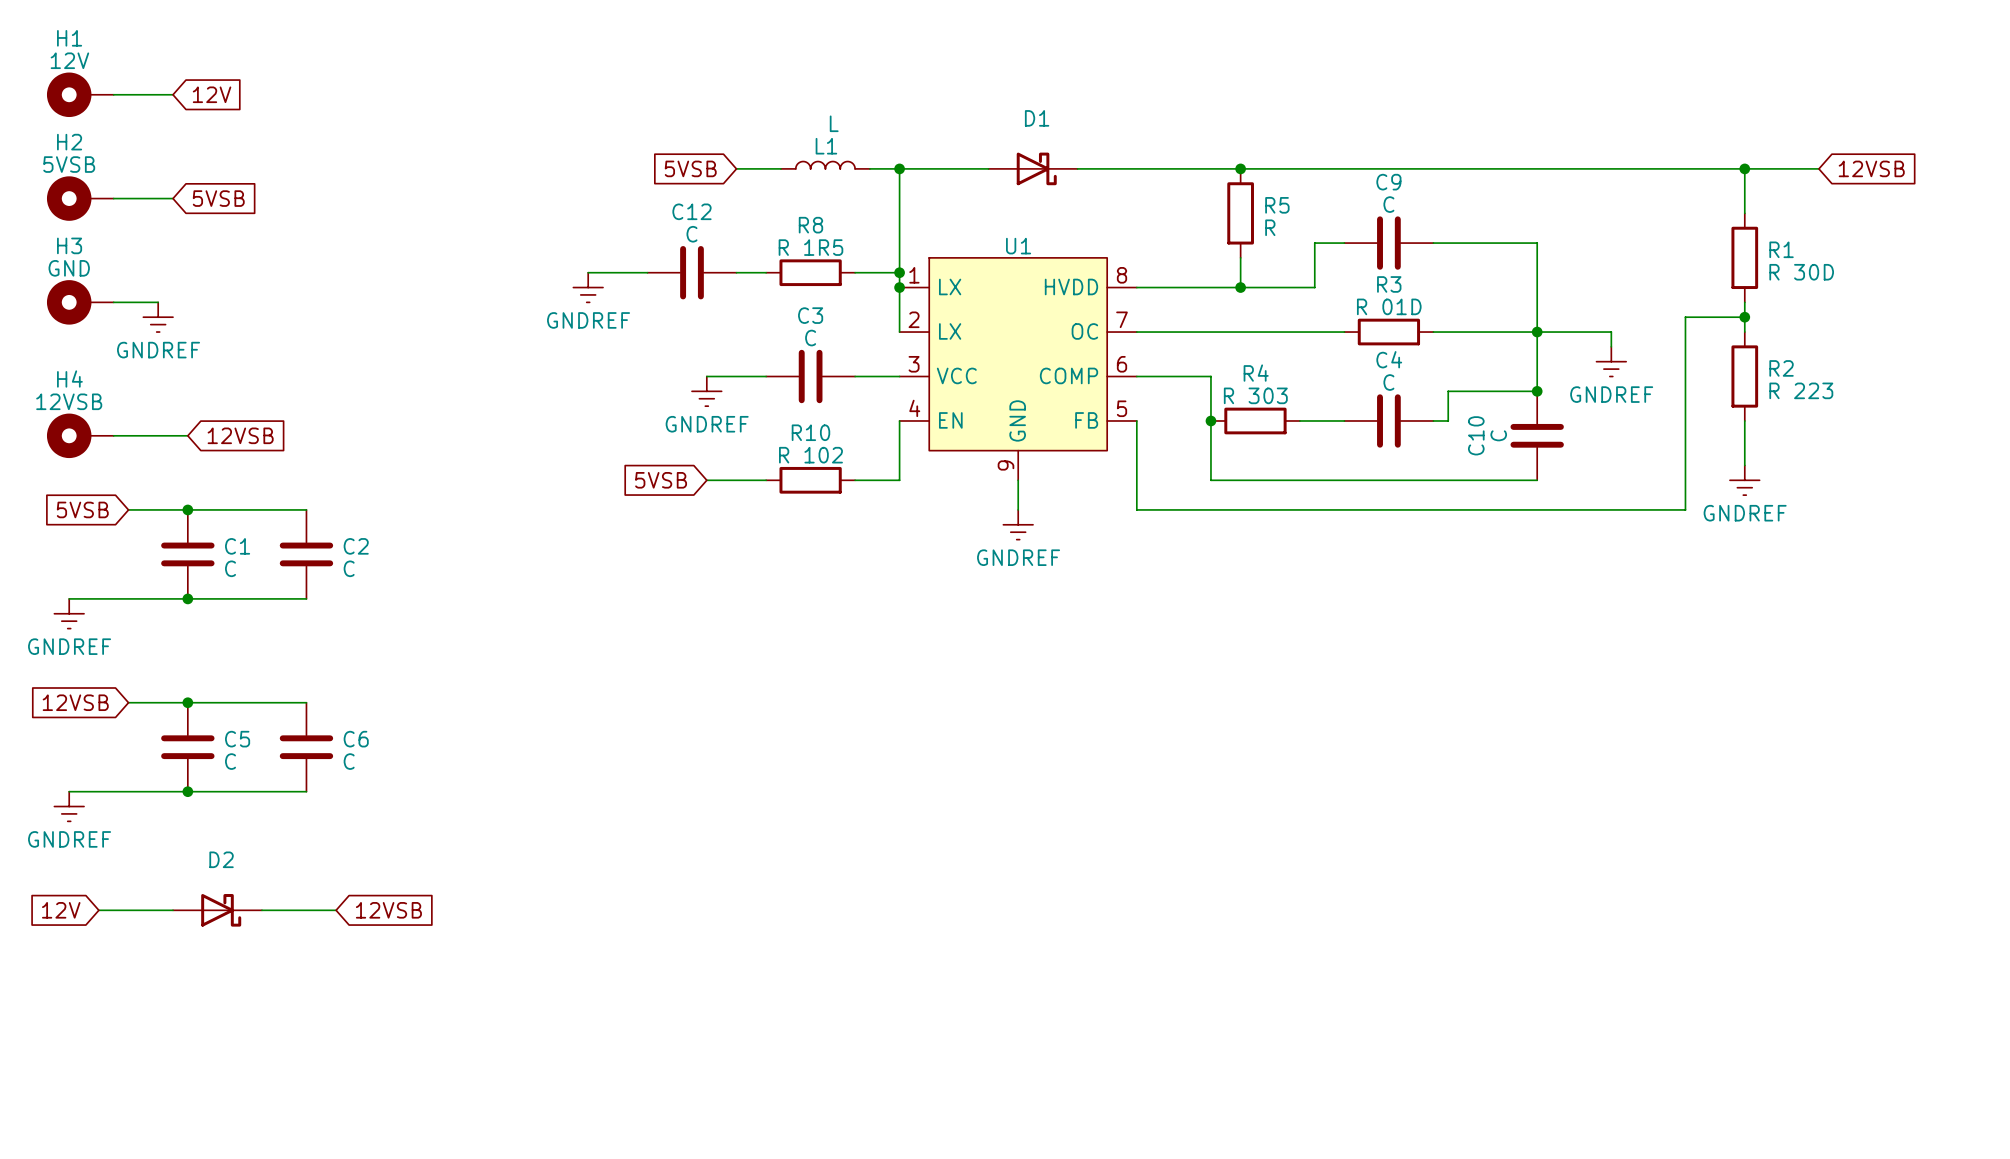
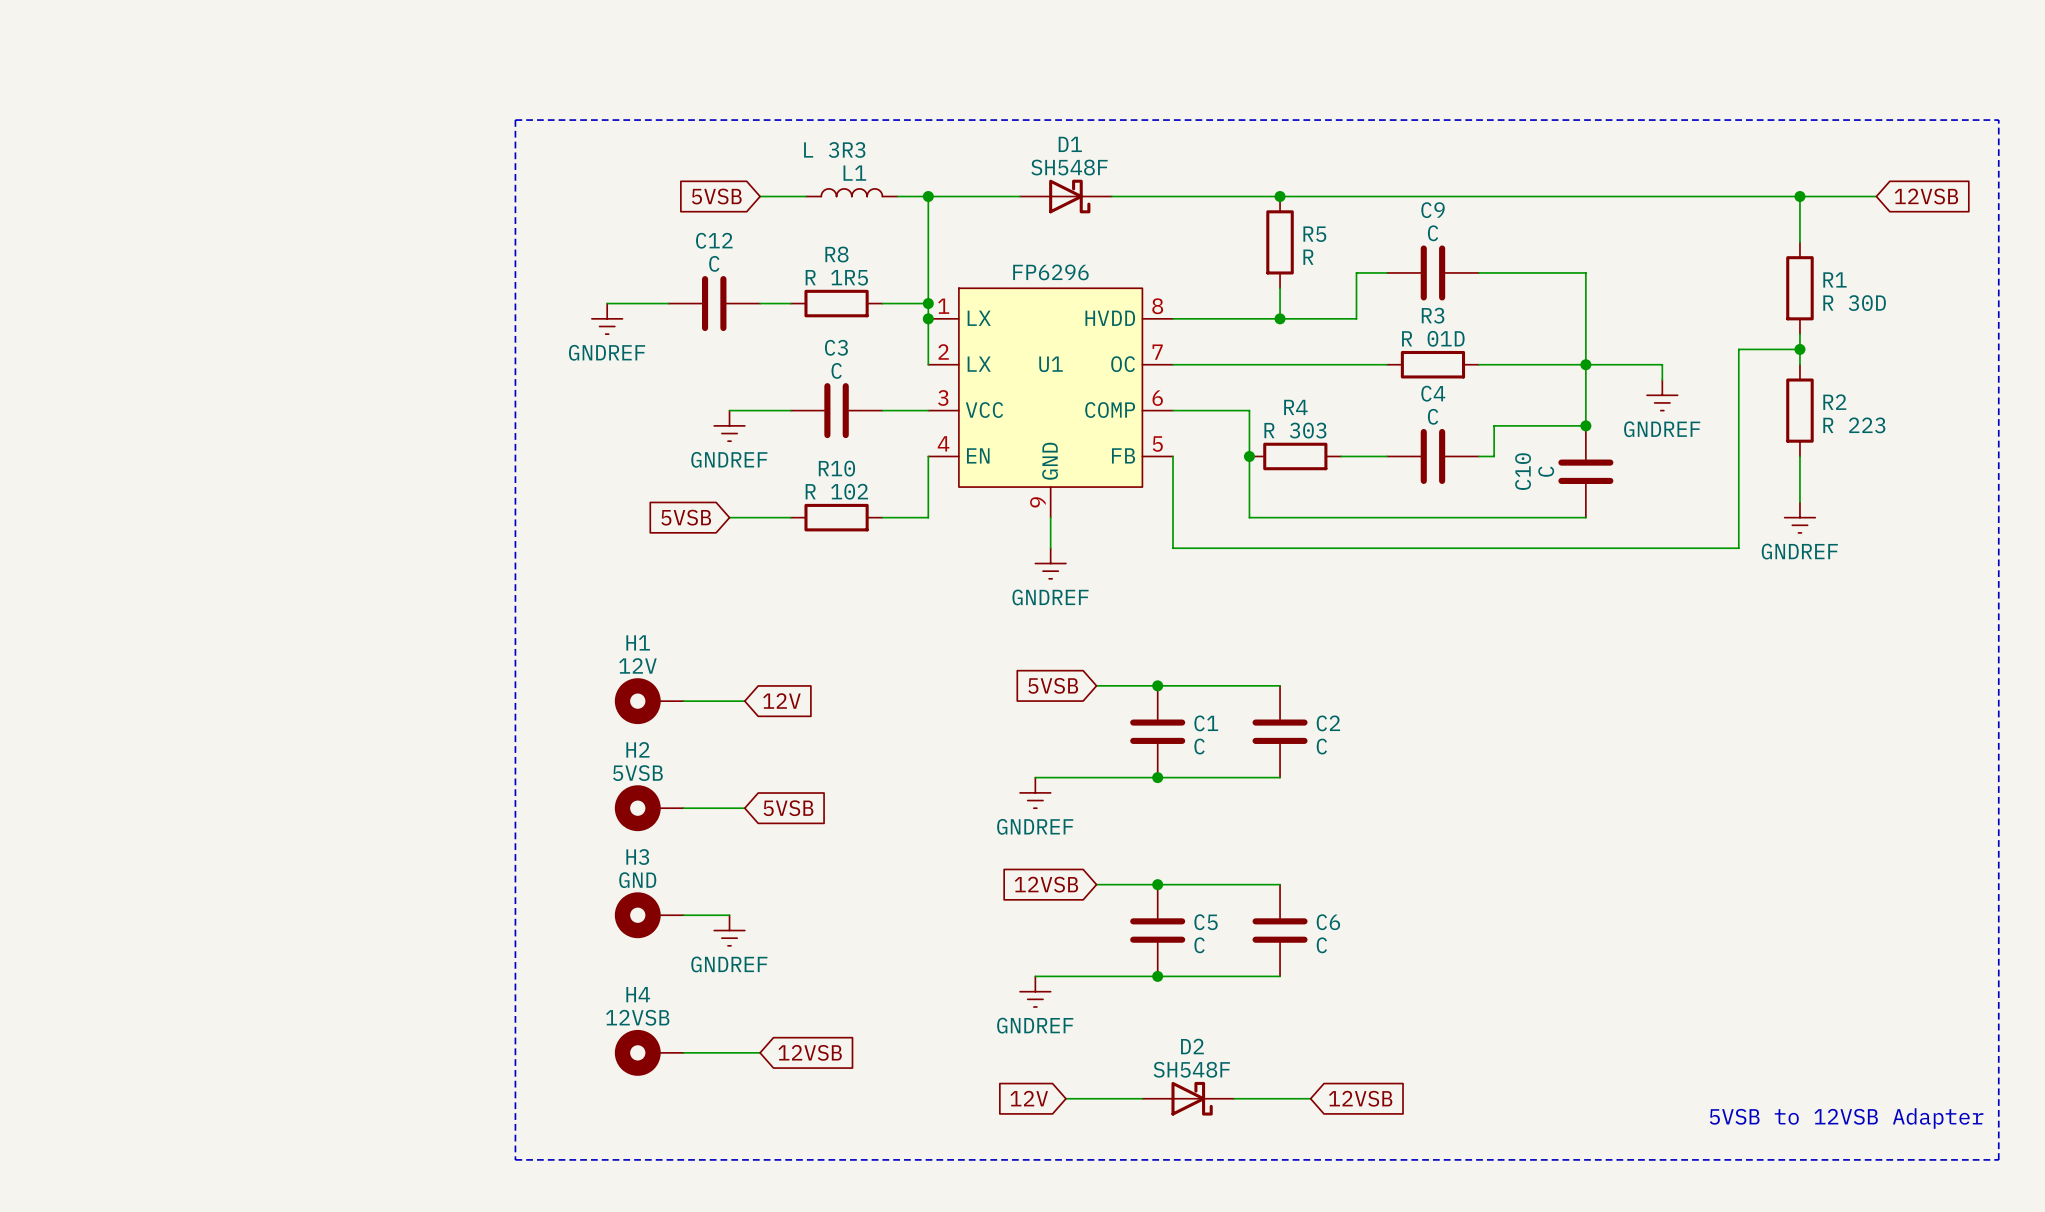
H1 position: (80, 94) -> (649, 701)
wire: (113, 94) (173, 94) -> none
global label: 12V (212, 94) -> none
line: none -> (515, 120) (1998, 120) (1998, 1159) (515, 1159) (515, 120)
L1 value: L (834, 123) -> L 3R3 (834, 149)
D1 value: none -> SH548F (1069, 167)
H2 position: (80, 198) -> (649, 808)
wire: (113, 198) (173, 198) -> none
global label: 5VSB (218, 198) -> none
U1 value: none -> FP6296 (1050, 272)
U1 name position: U1 (1018, 246) -> U1 (1051, 364)
H3 position: (80, 302) -> (649, 915)
wire: (113, 302) (158, 302) -> none
power symbol: GNDREF (158, 317) -> none
H4 position: (80, 435) -> (649, 1052)
wire: (113, 435) (187, 435) -> none
global label: 12VSB (240, 435) -> none
global label: 5VSB (82, 509) -> none
wire: (128, 509) (306, 509) -> none
junction: (187, 509) -> none
C1 position: (187, 554) -> (1157, 731)
C2 position: (306, 554) -> (1280, 731)
wire: (69, 598) (306, 598) -> none
junction: (187, 598) -> none
power symbol: GNDREF (69, 613) -> none
global label: none -> 5VSB (1053, 685)
wire: none -> (1096, 685) (1280, 685)
junction: none -> (1157, 685)
wire: none -> (683, 701) (744, 701)
global label: none -> 12V (781, 701)
global label: 12VSB (75, 702) -> none
wire: (128, 702) (306, 702) -> none
junction: (187, 702) -> none
wire: none -> (1035, 777) (1280, 777)
junction: none -> (1157, 777)
C5 position: (187, 747) -> (1157, 930)
C6 position: (306, 747) -> (1280, 930)
power symbol: none -> GNDREF (1035, 792)
wire: none -> (683, 808) (744, 808)
global label: none -> 5VSB (788, 808)
wire: (69, 791) (306, 791) -> none
junction: (187, 791) -> none
power symbol: GNDREF (69, 806) -> none
global label: none -> 12VSB (1046, 884)
wire: none -> (1096, 884) (1280, 884)
junction: none -> (1157, 884)
wire: none -> (683, 915) (729, 915)
power symbol: none -> GNDREF (729, 930)
global label: 12V (61, 910) -> none
wire: (98, 910) (173, 910) -> none
D2 position: (217, 910) -> (1188, 1098)
wire: (261, 910) (336, 910) -> none
global label: 12VSB (388, 910) -> none
wire: none -> (1035, 976) (1280, 976)
junction: none -> (1157, 976)
power symbol: none -> GNDREF (1035, 991)
wire: none -> (683, 1052) (760, 1052)
global label: none -> 12VSB (810, 1052)
D2 value: none -> SH548F (1191, 1069)
global label: none -> 12V (1029, 1098)
wire: none -> (1065, 1098) (1142, 1098)
wire: none -> (1234, 1098) (1310, 1098)
global label: none -> 12VSB (1360, 1098)
text: none -> 5VSB to 12VSB Adapter (1846, 1118)

